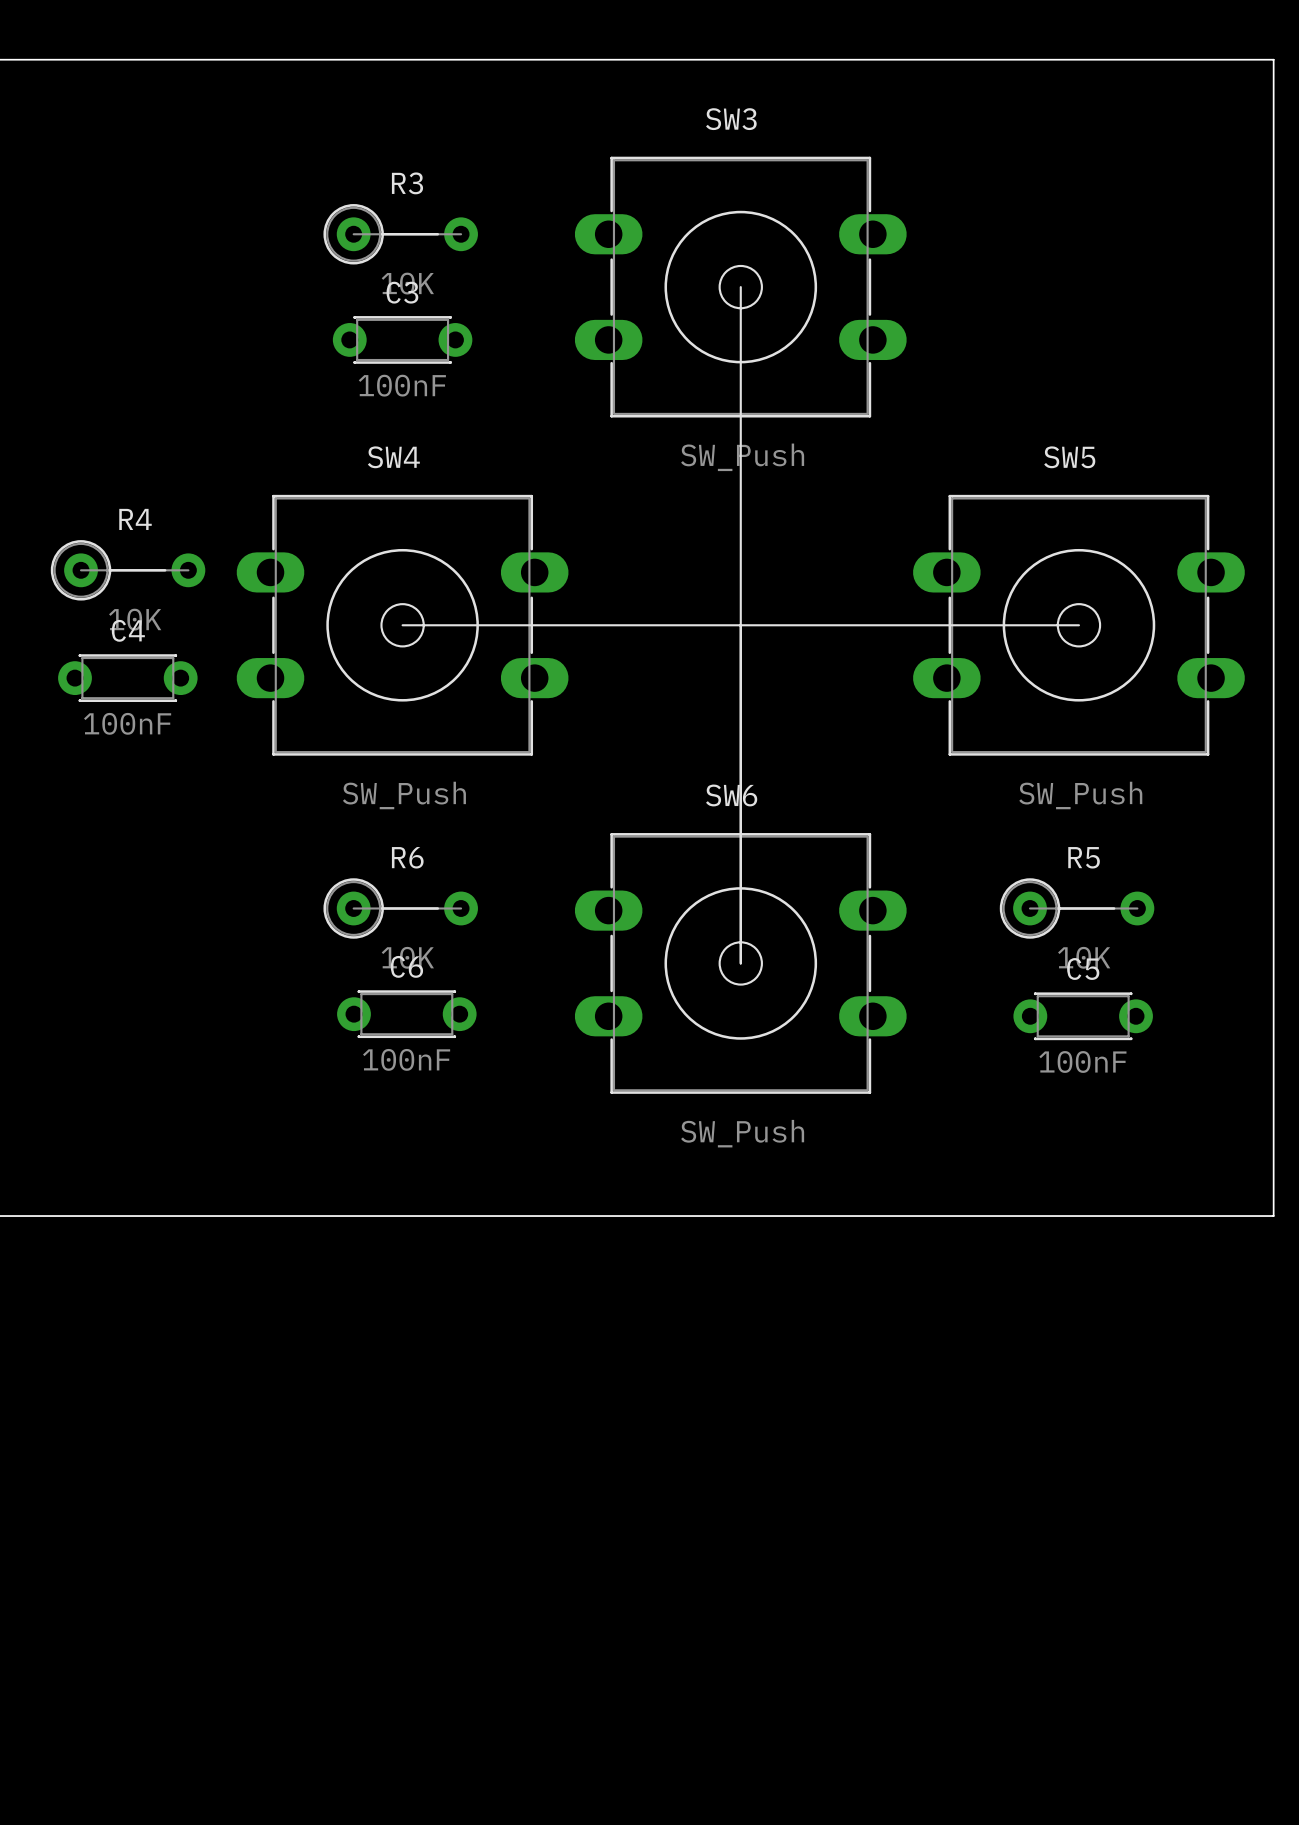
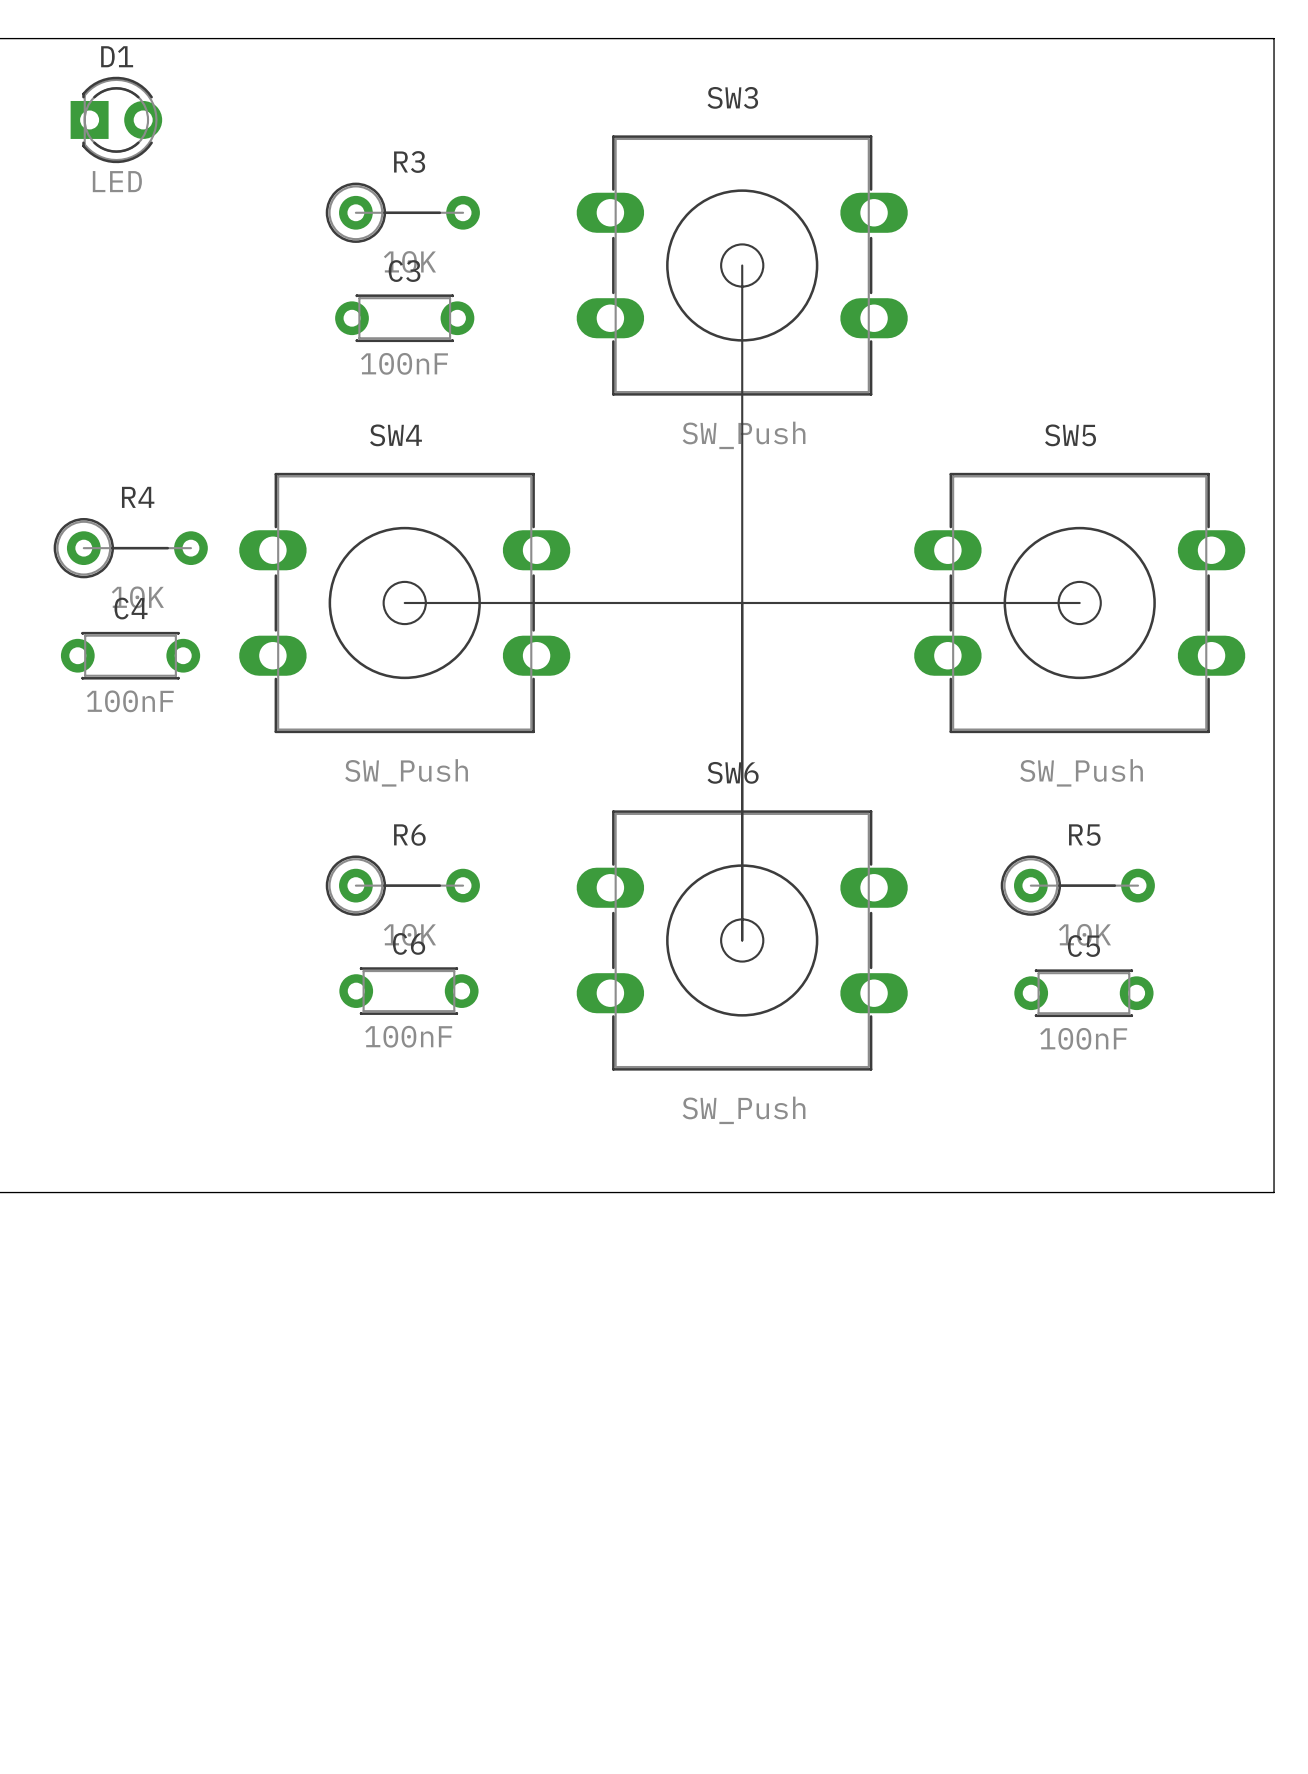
D1: none -> LED (116, 119)

